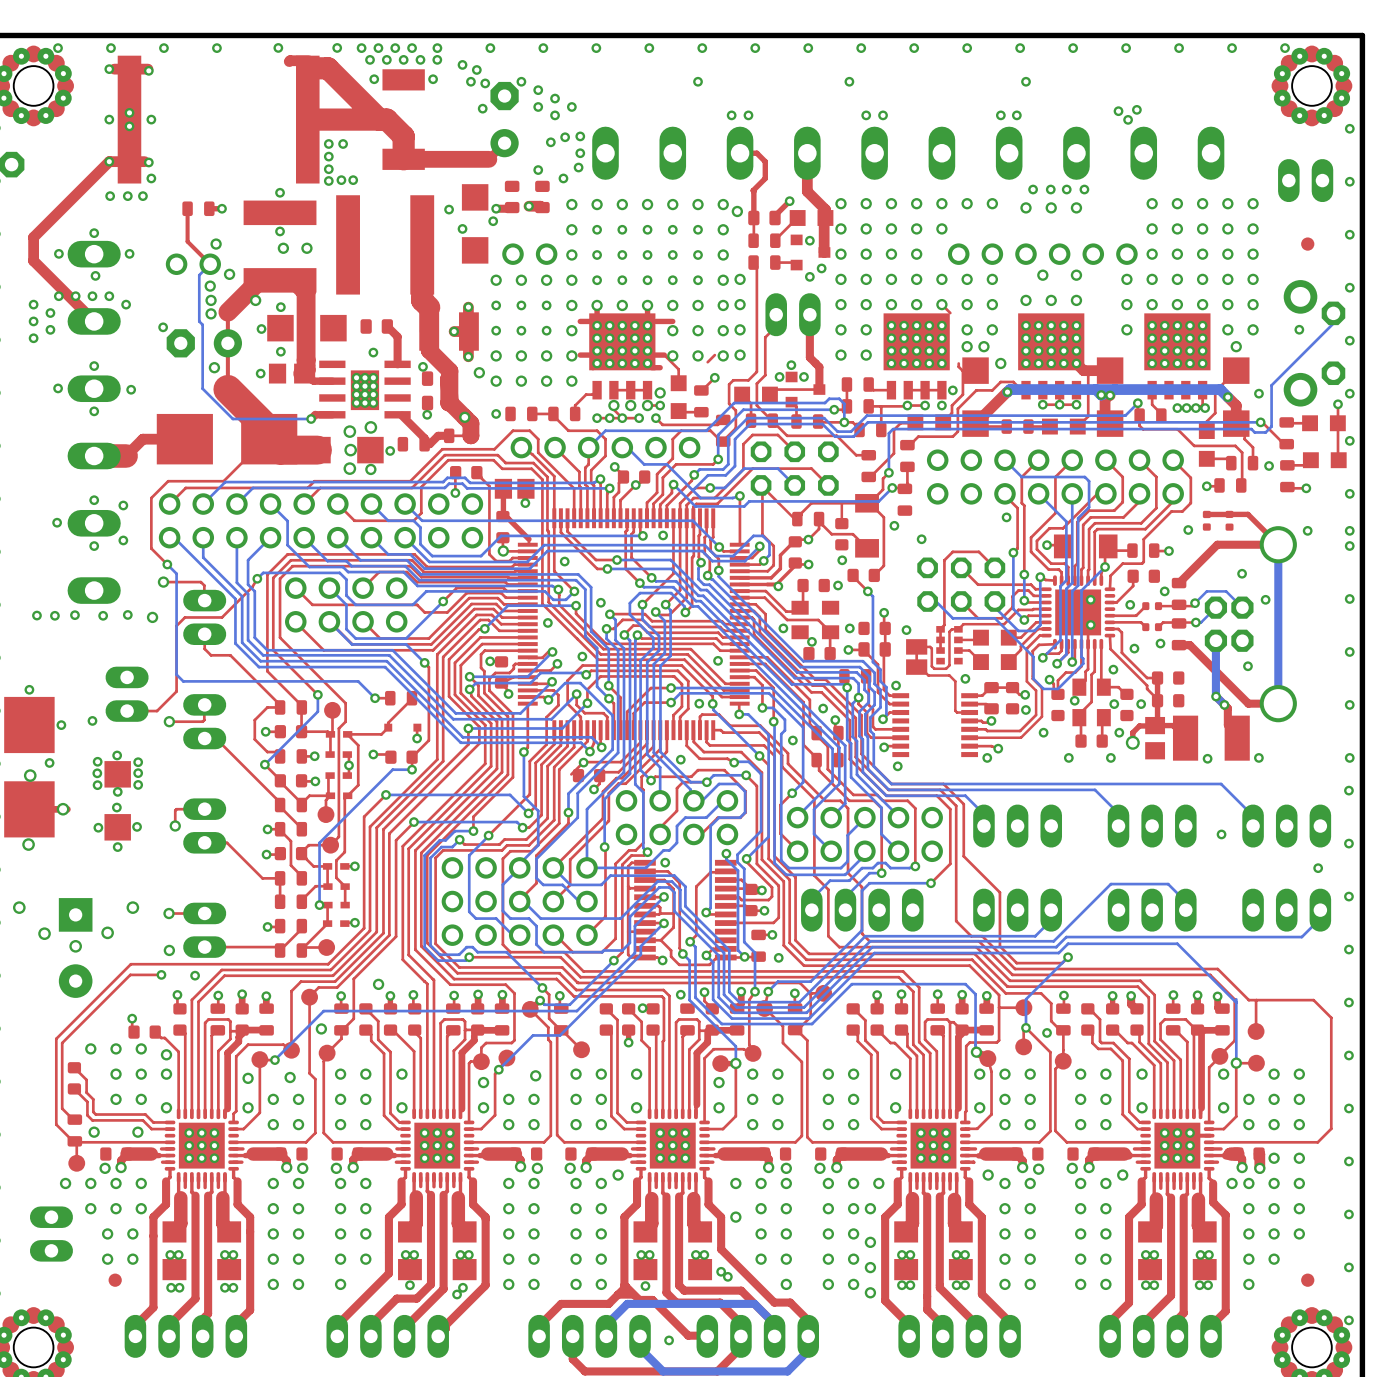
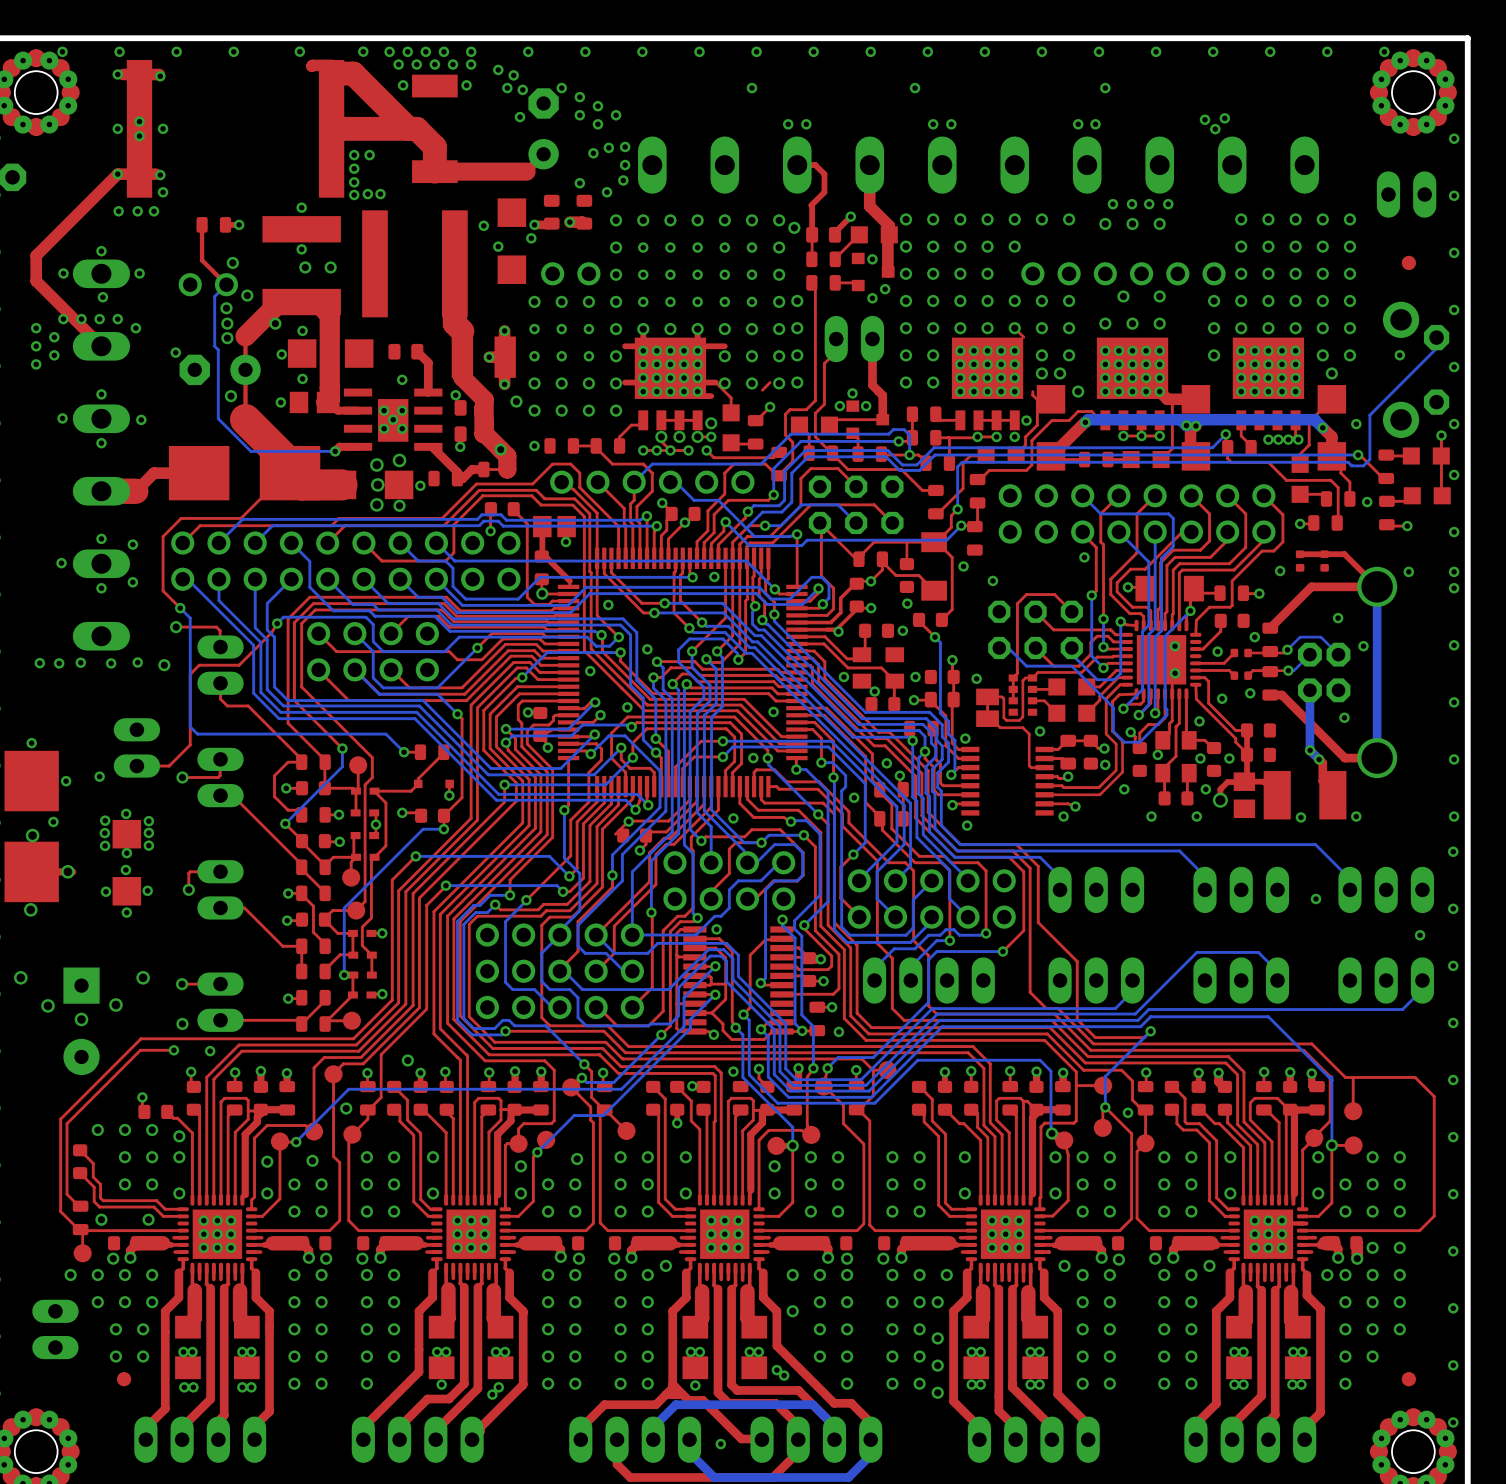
via: (356, 377) -> none
via: (364, 377) -> none
via: (373, 377) -> none
via: none -> (384, 410)
via: none -> (402, 410)
via: (356, 386) -> none
via: (364, 386) -> none
via: (373, 386) -> none
via: none -> (393, 419)
via: (356, 394) -> none
via: (364, 394) -> none
via: (373, 394) -> none
via: none -> (384, 428)
via: none -> (402, 428)
via: (356, 403) -> none
via: (364, 403) -> none
via: (373, 403) -> none

